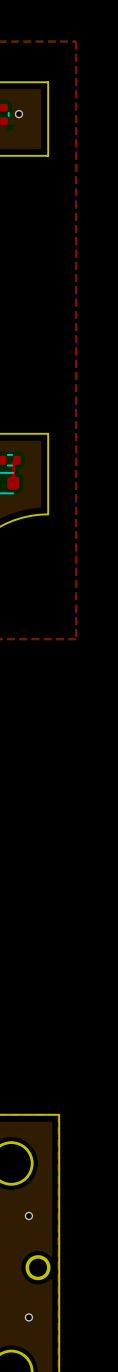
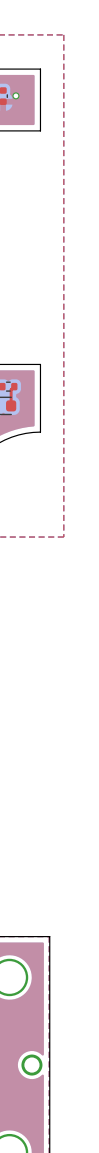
via: (28, 1215) -> none
via: (28, 1317) -> none

